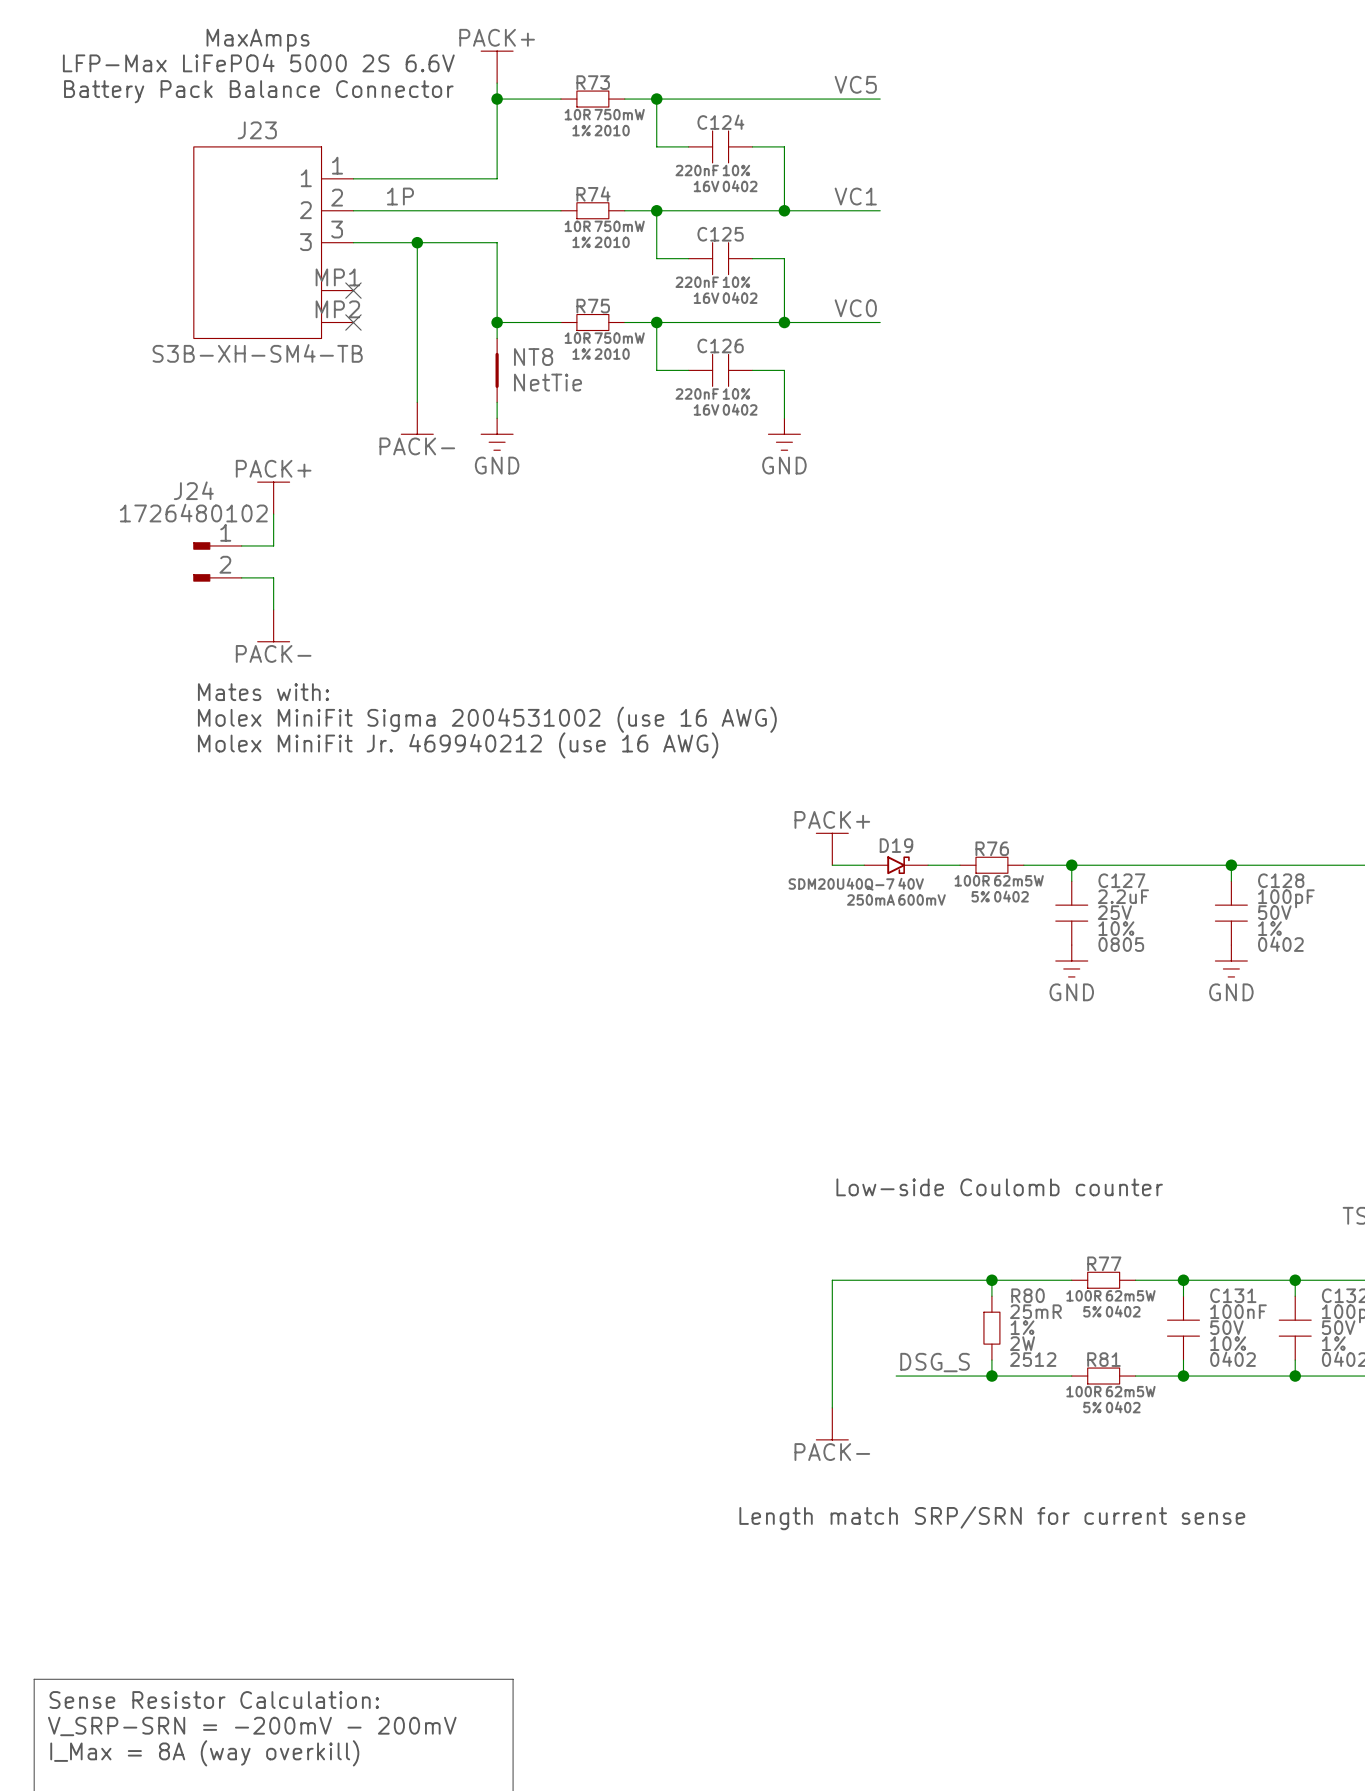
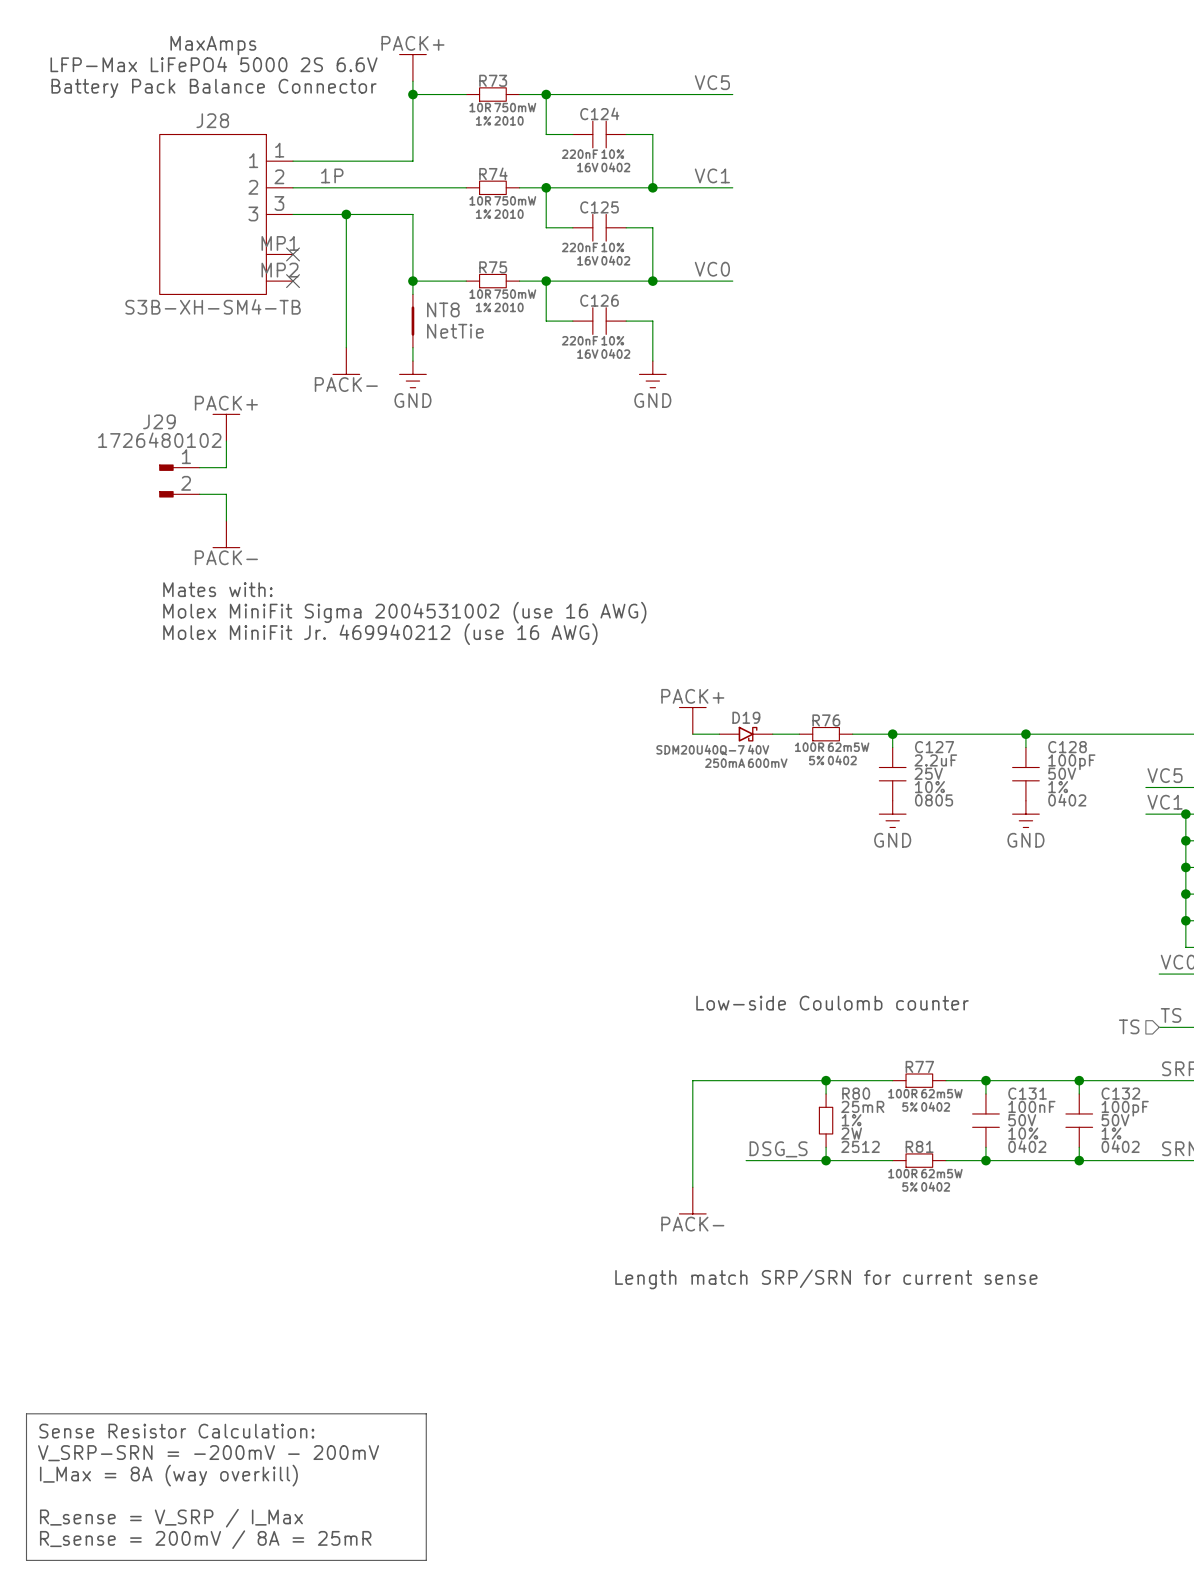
J23 name: J23 (257, 130) -> J28 (212, 120)
J24 name: J24 (193, 490) -> J29 (159, 421)

